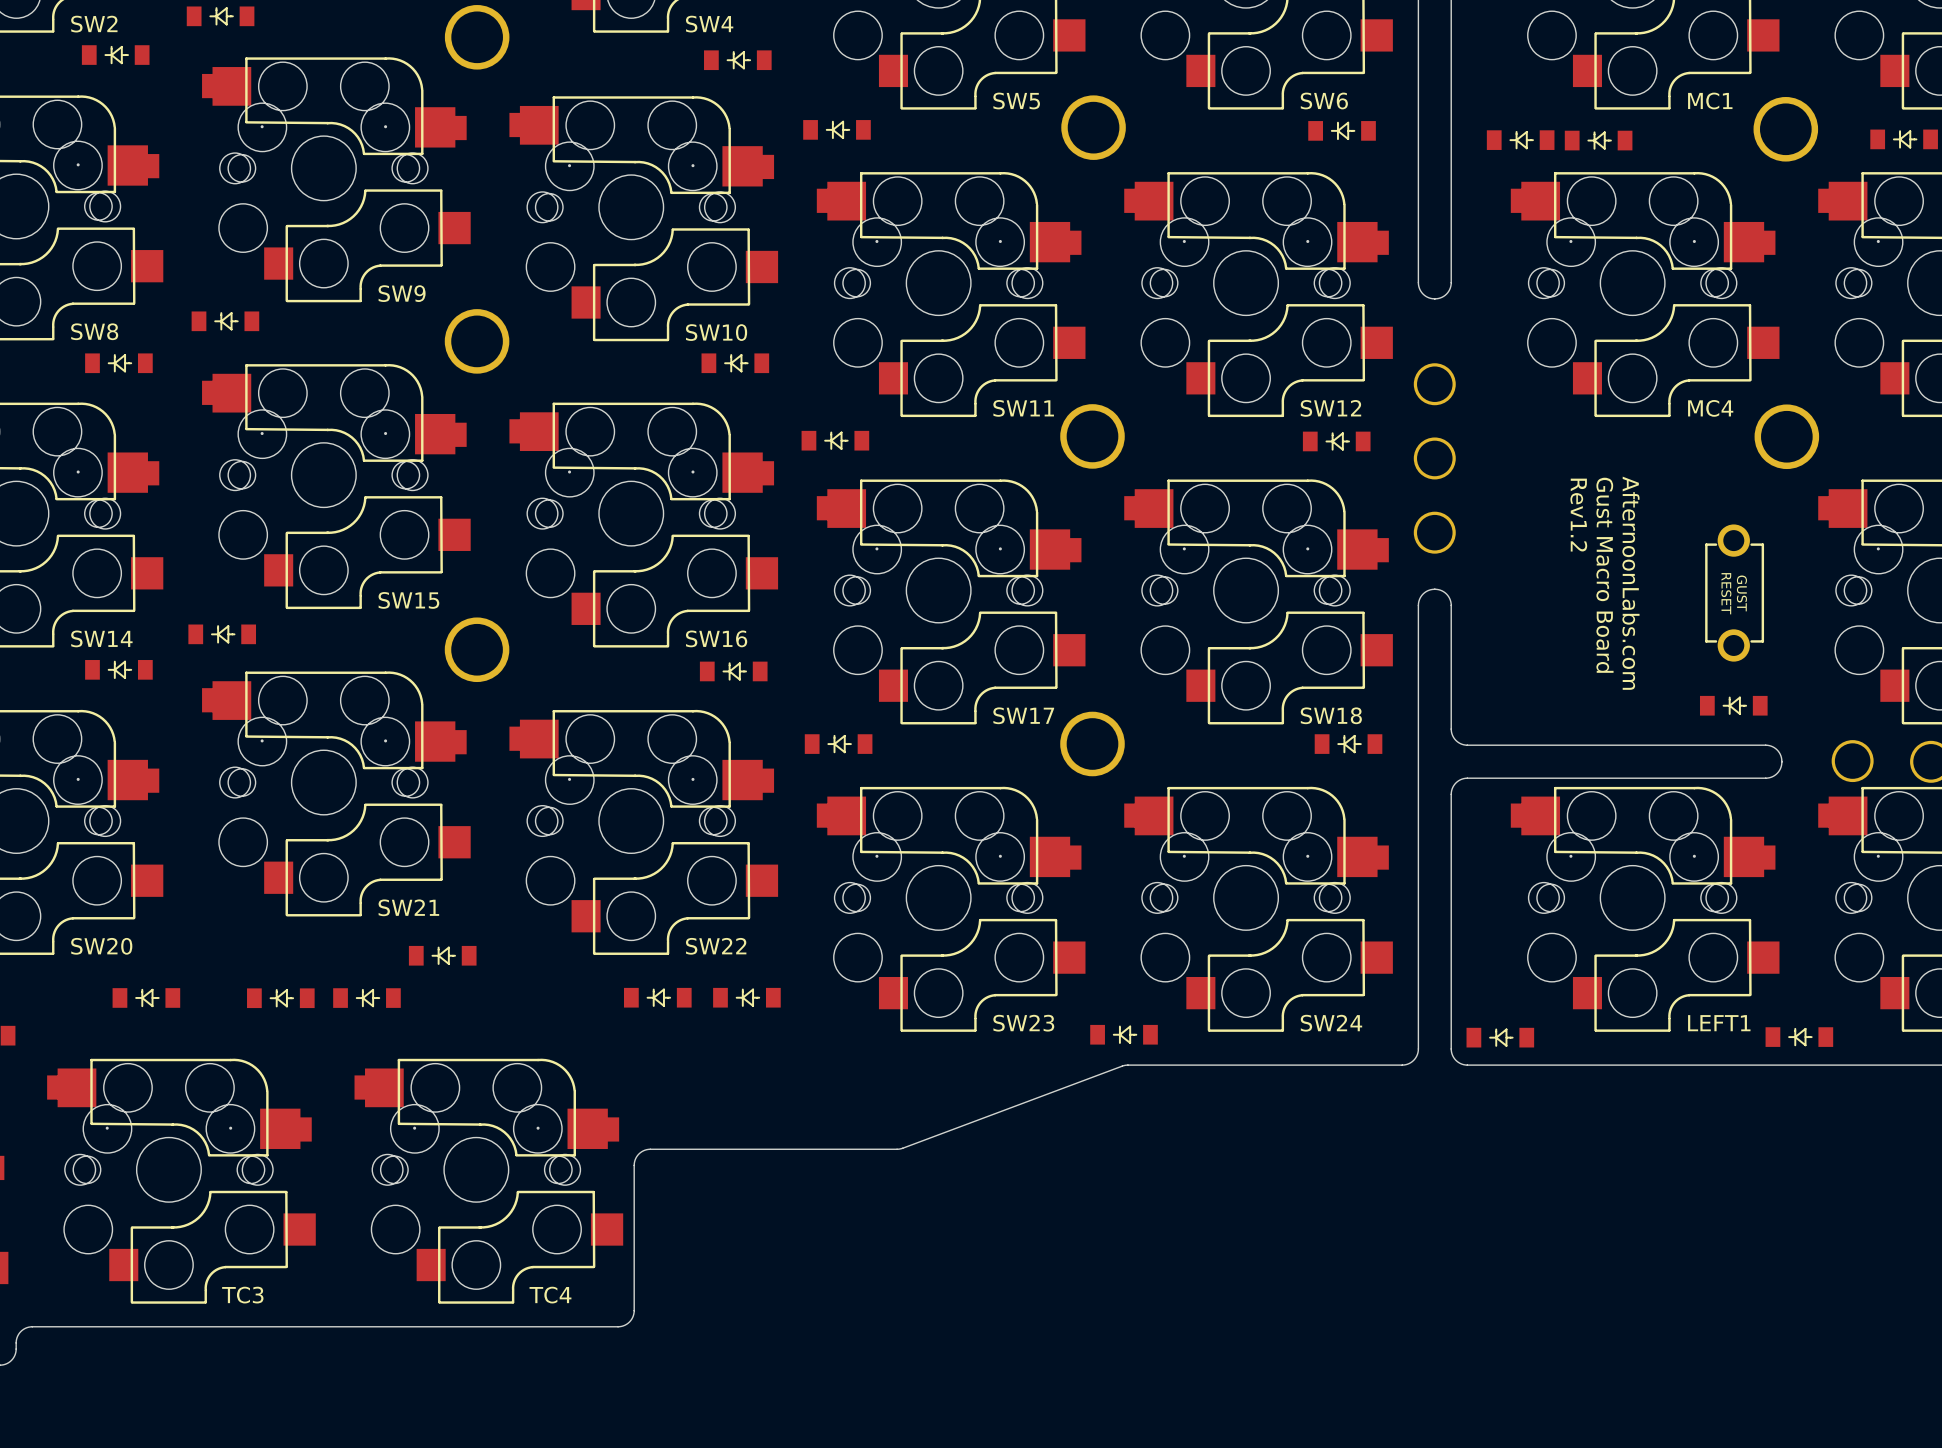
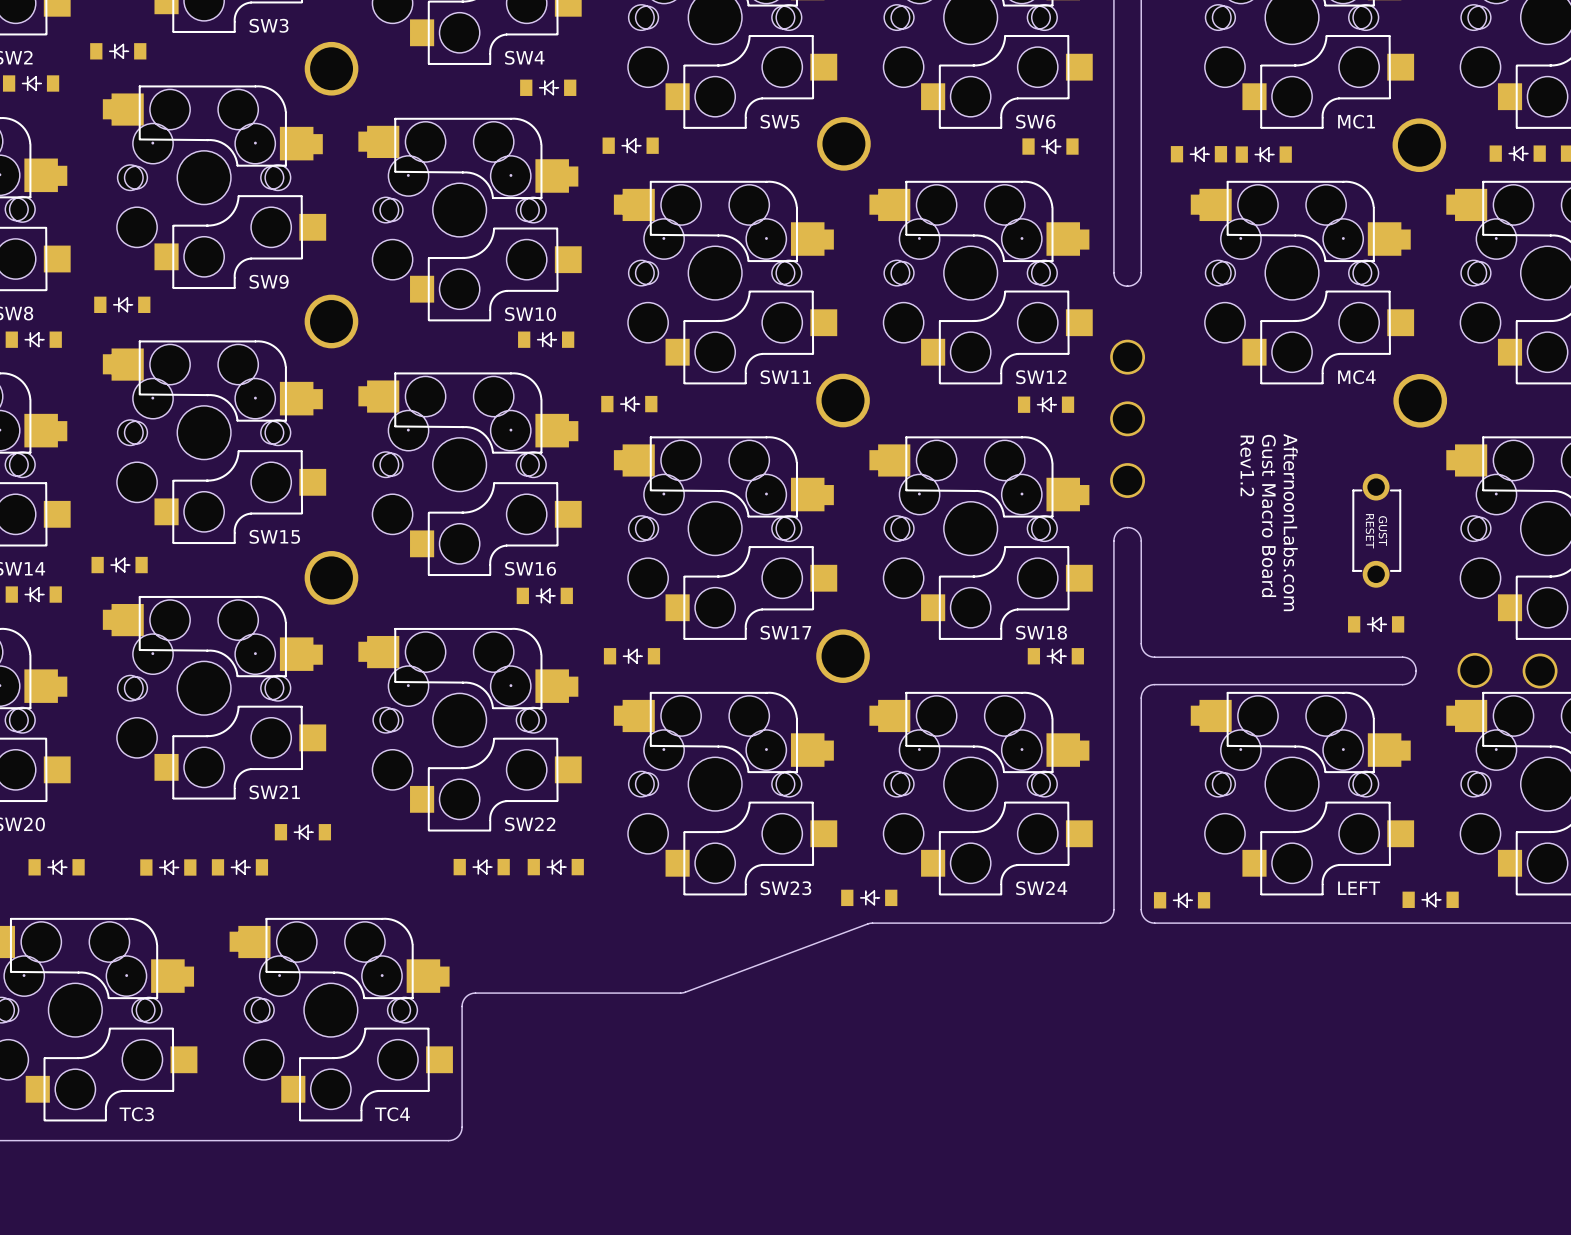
LEFT1 name: LEFT1 (1719, 1023) -> LEFT (1359, 888)

